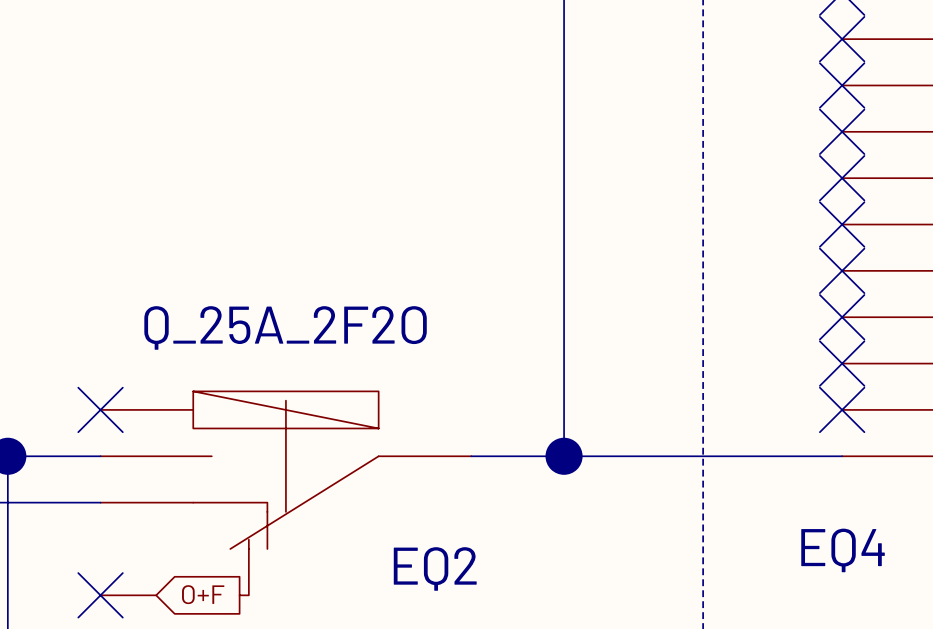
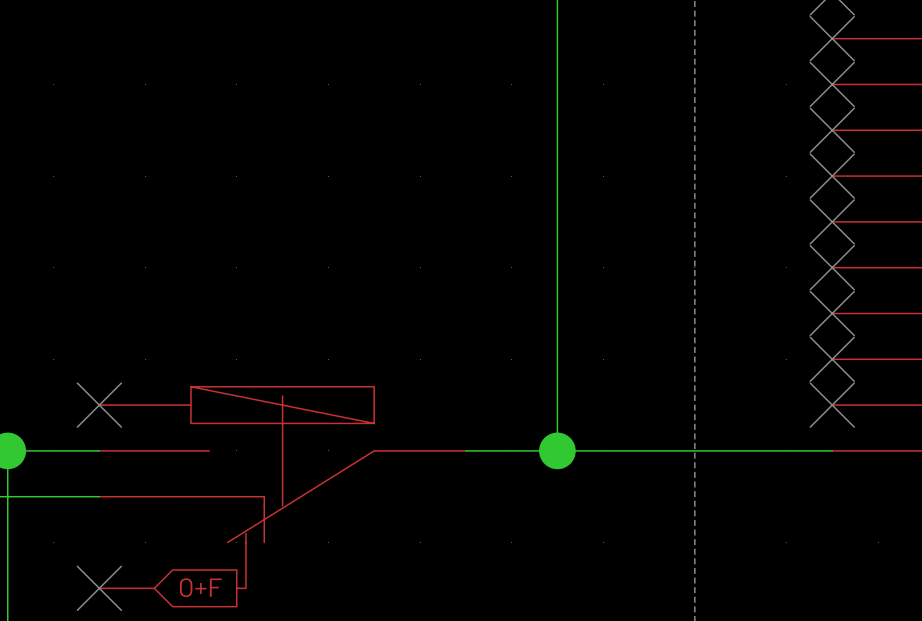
EQ2 value: Q_25A_2F2O (285, 327) -> none
EQ4 name: EQ4 (843, 550) -> none
EQ2 name: EQ2 (435, 568) -> none

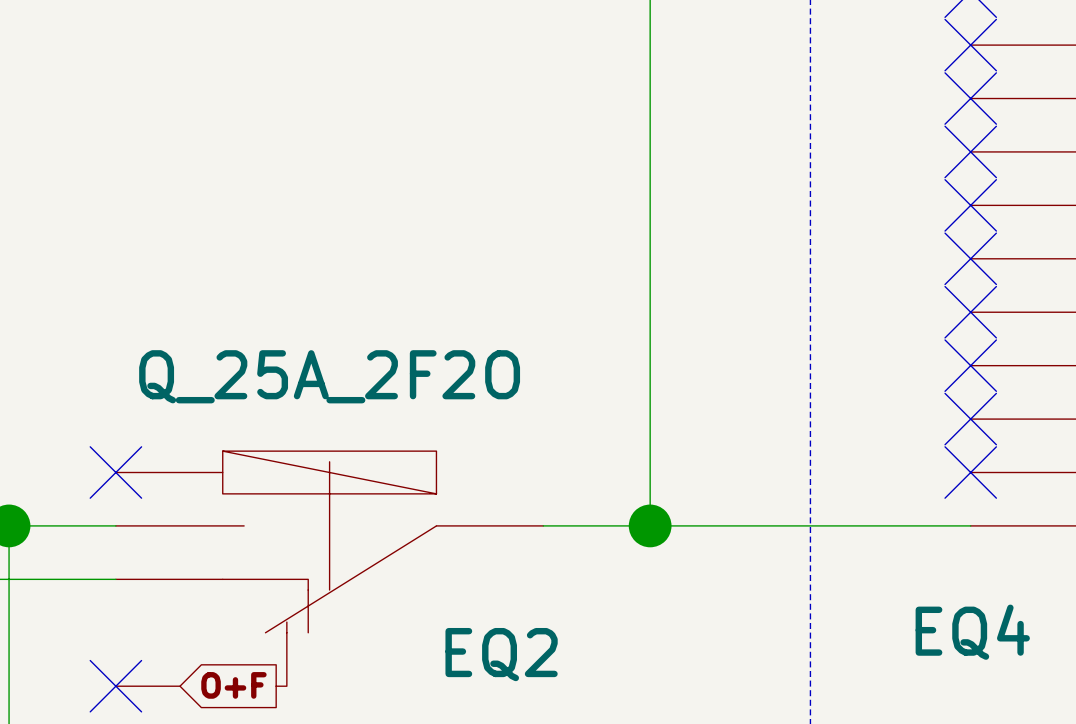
EQ2 value: none -> Q_25A_2F2O (329, 376)
EQ4 name: none -> EQ4 (972, 632)
EQ2 name: none -> EQ2 (501, 654)

